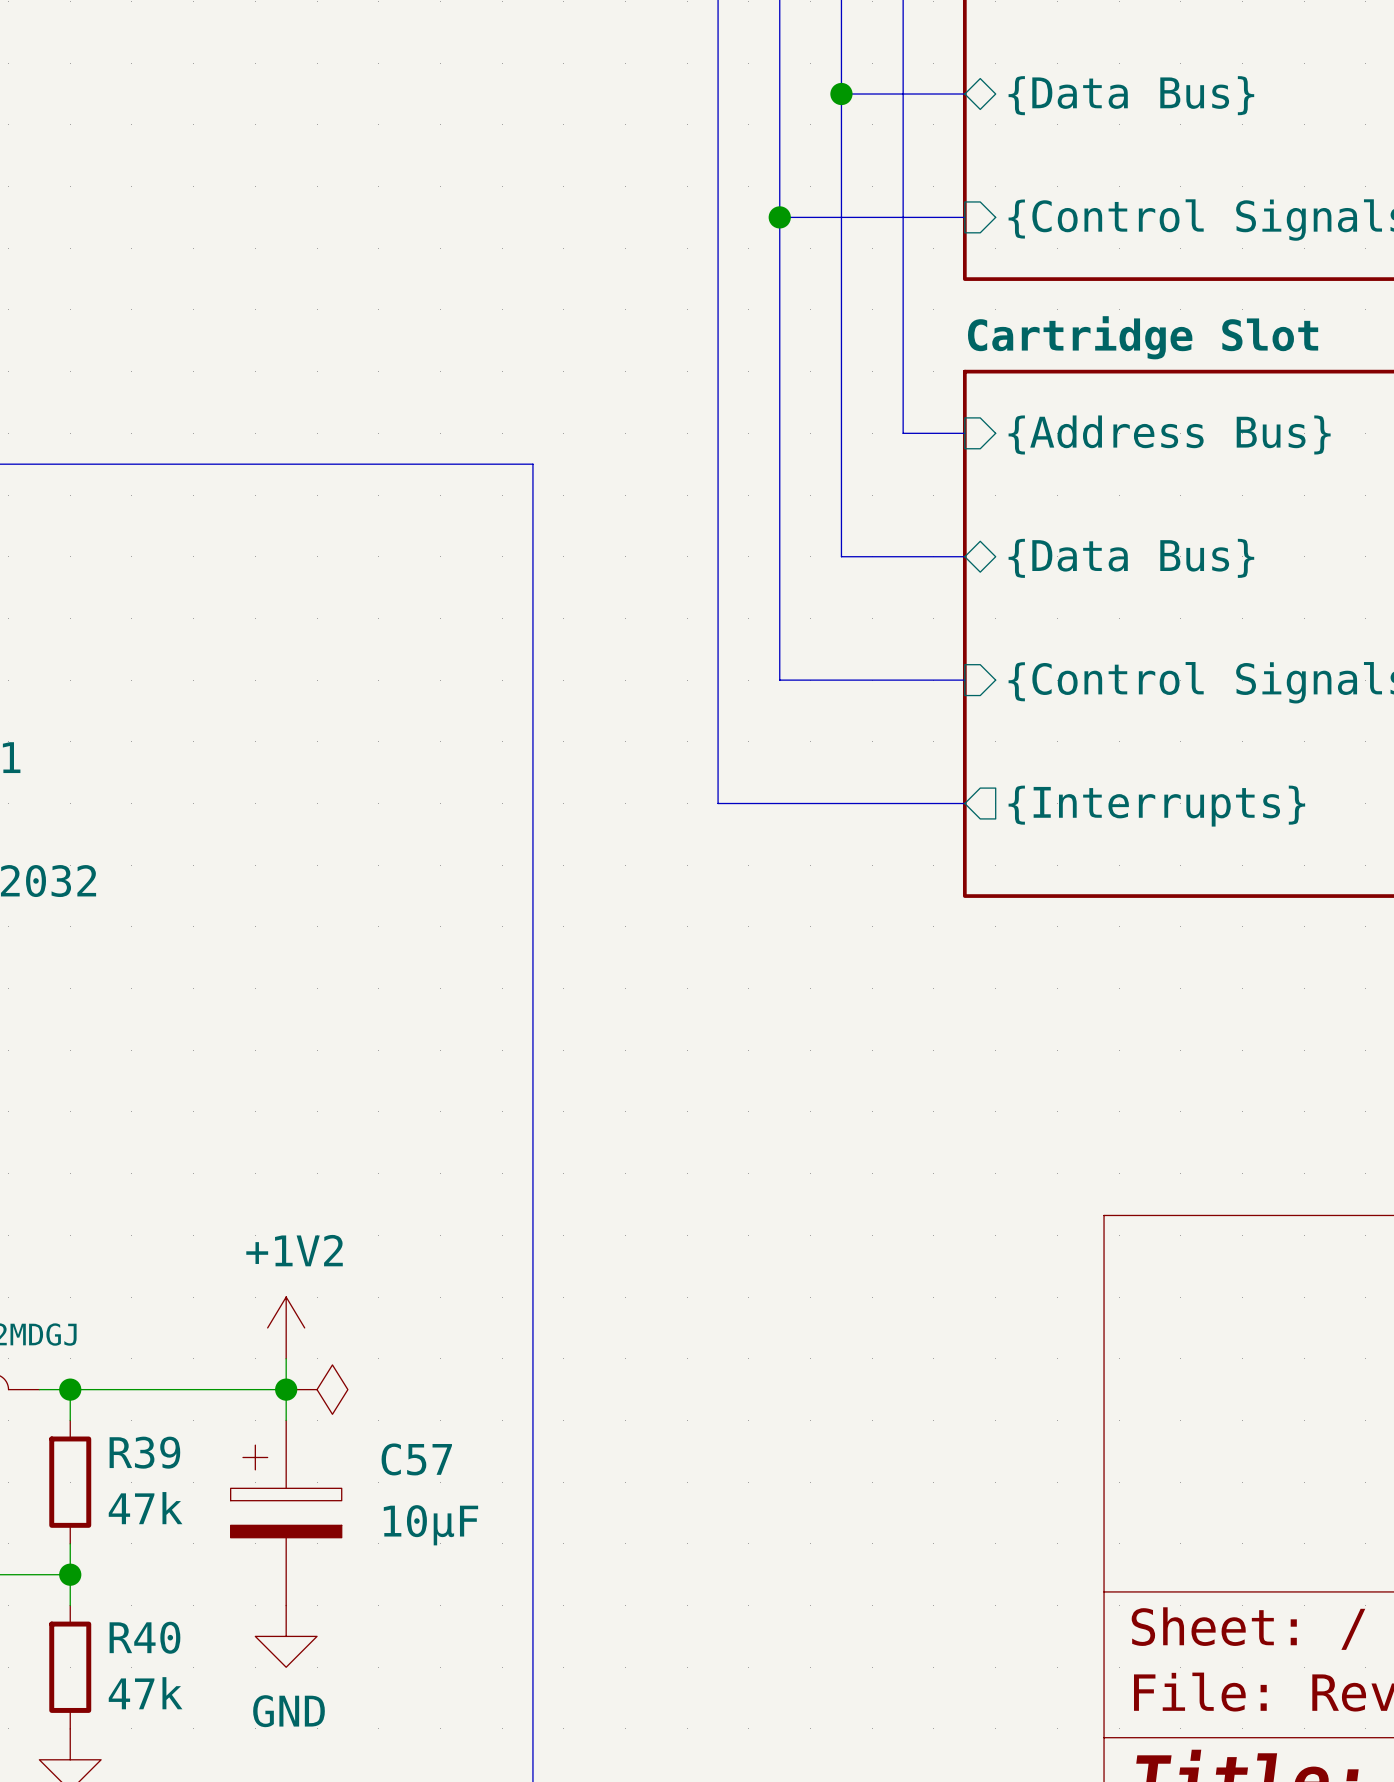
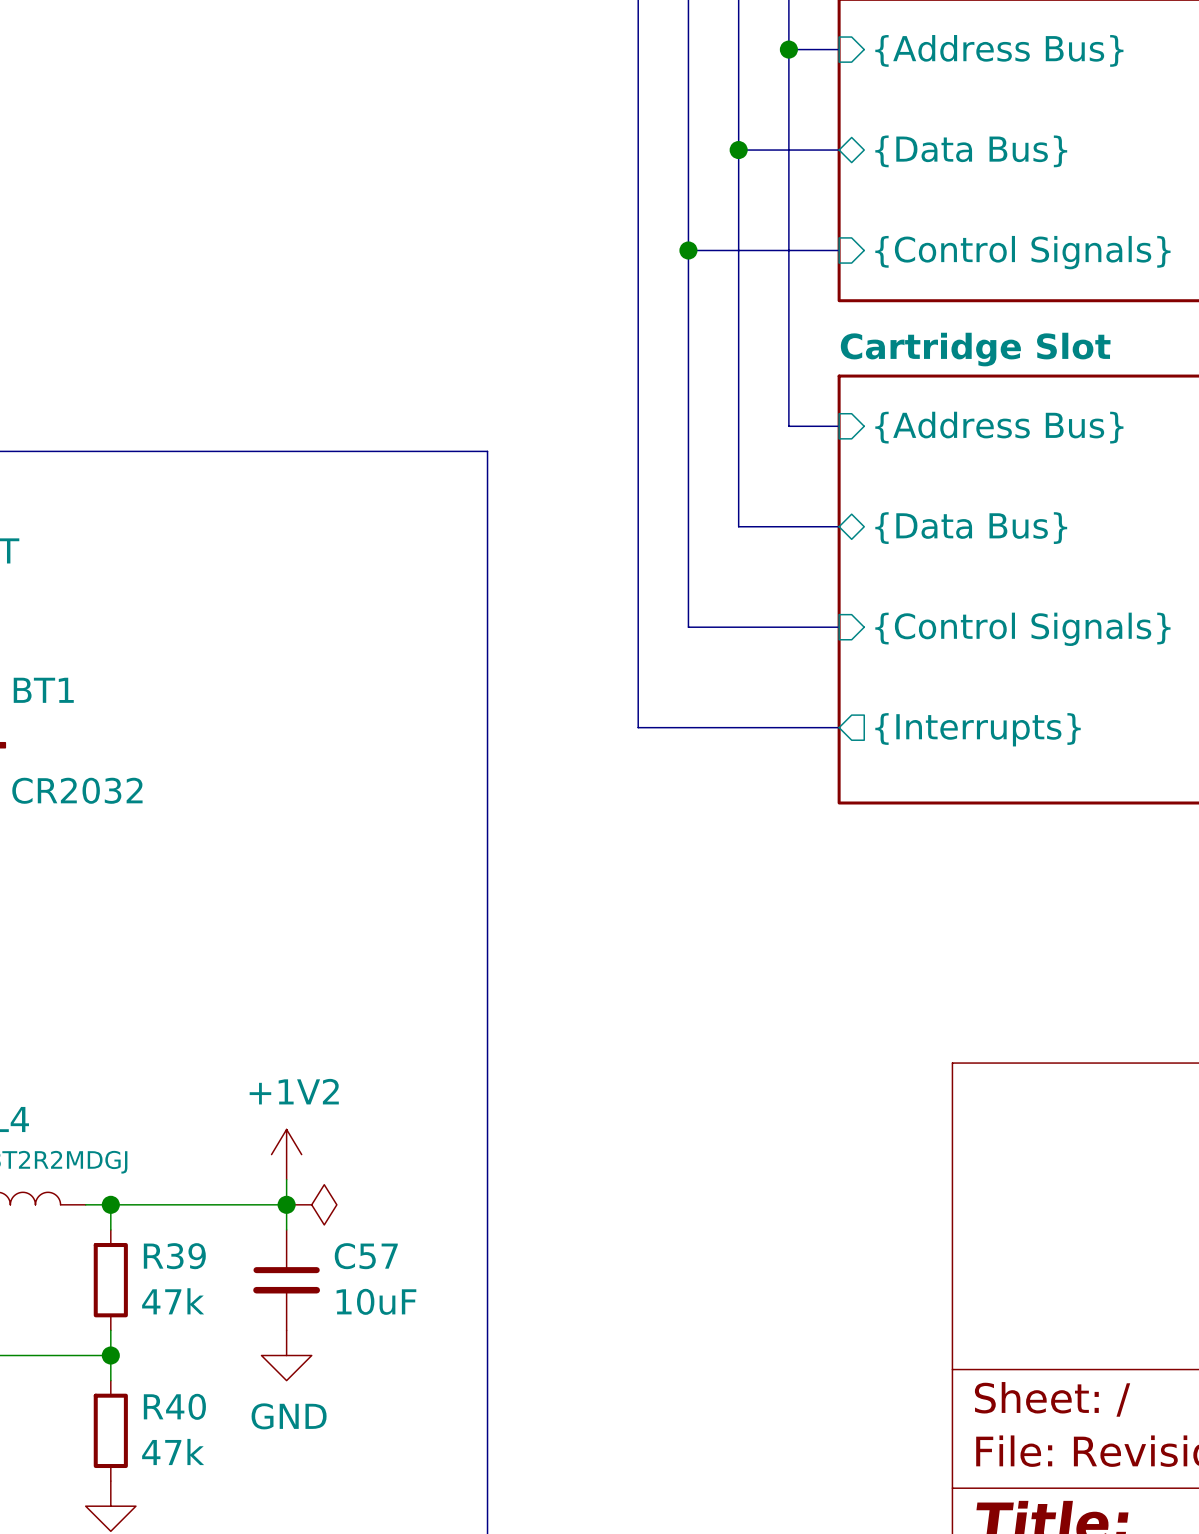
C57 symbol: [230, 1420, 342, 1606] -> [253, 1229, 321, 1331]
C57 value: 10µF (430, 1525) -> 10uF (376, 1301)
power symbol position: GND (286, 1636) -> GND (286, 1355)

